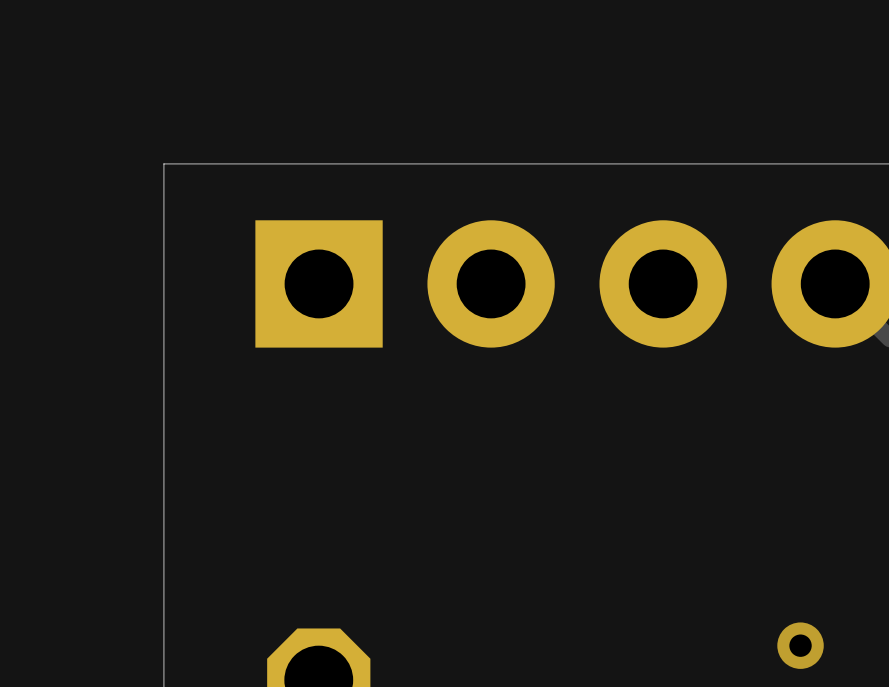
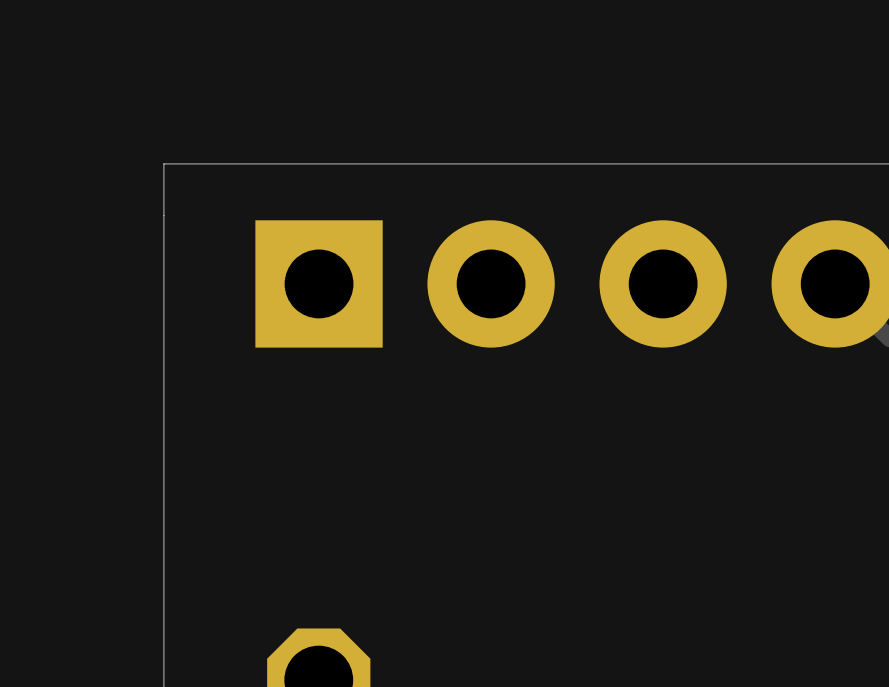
via: (800, 645) -> none

